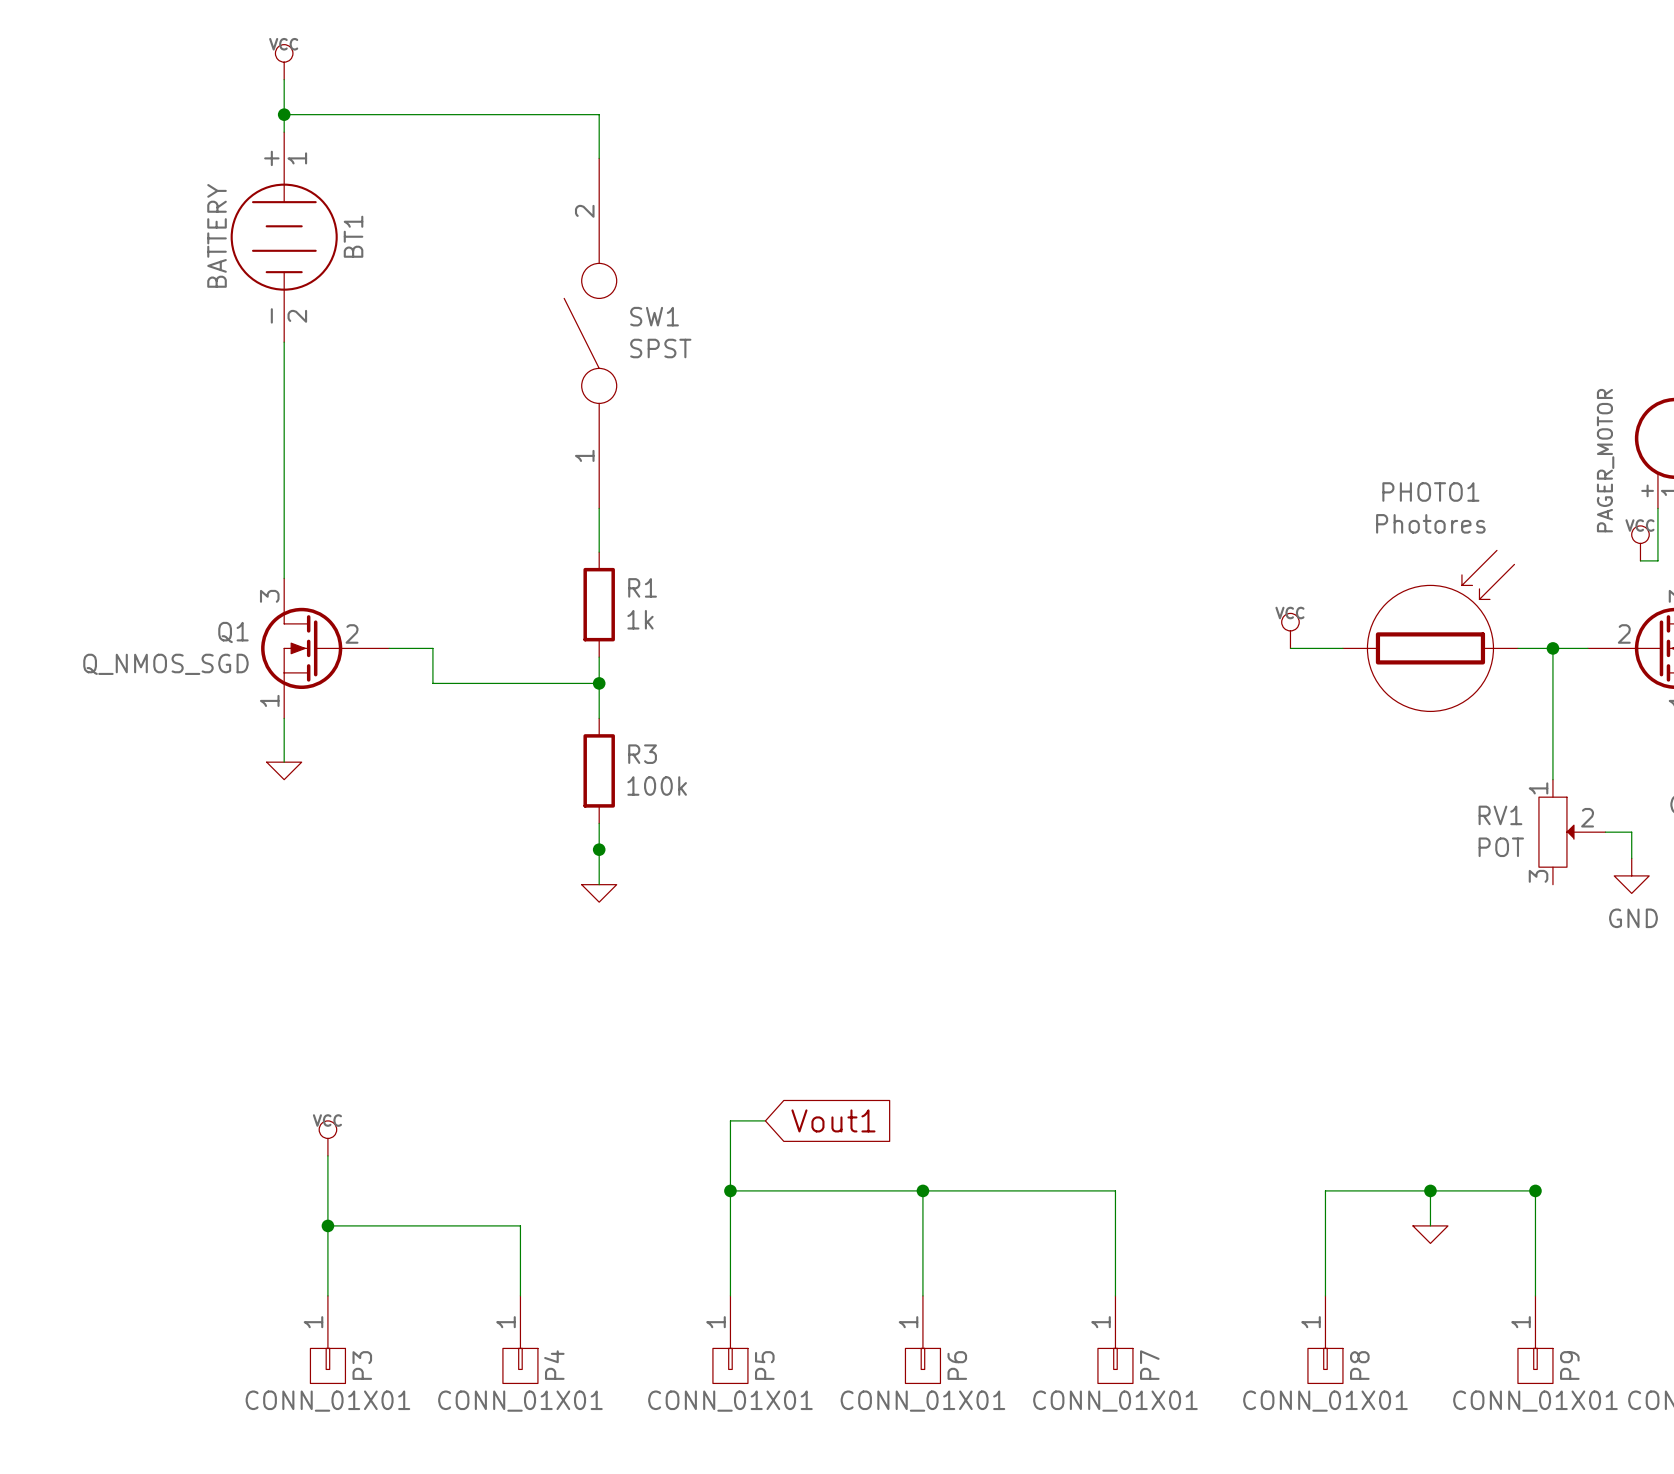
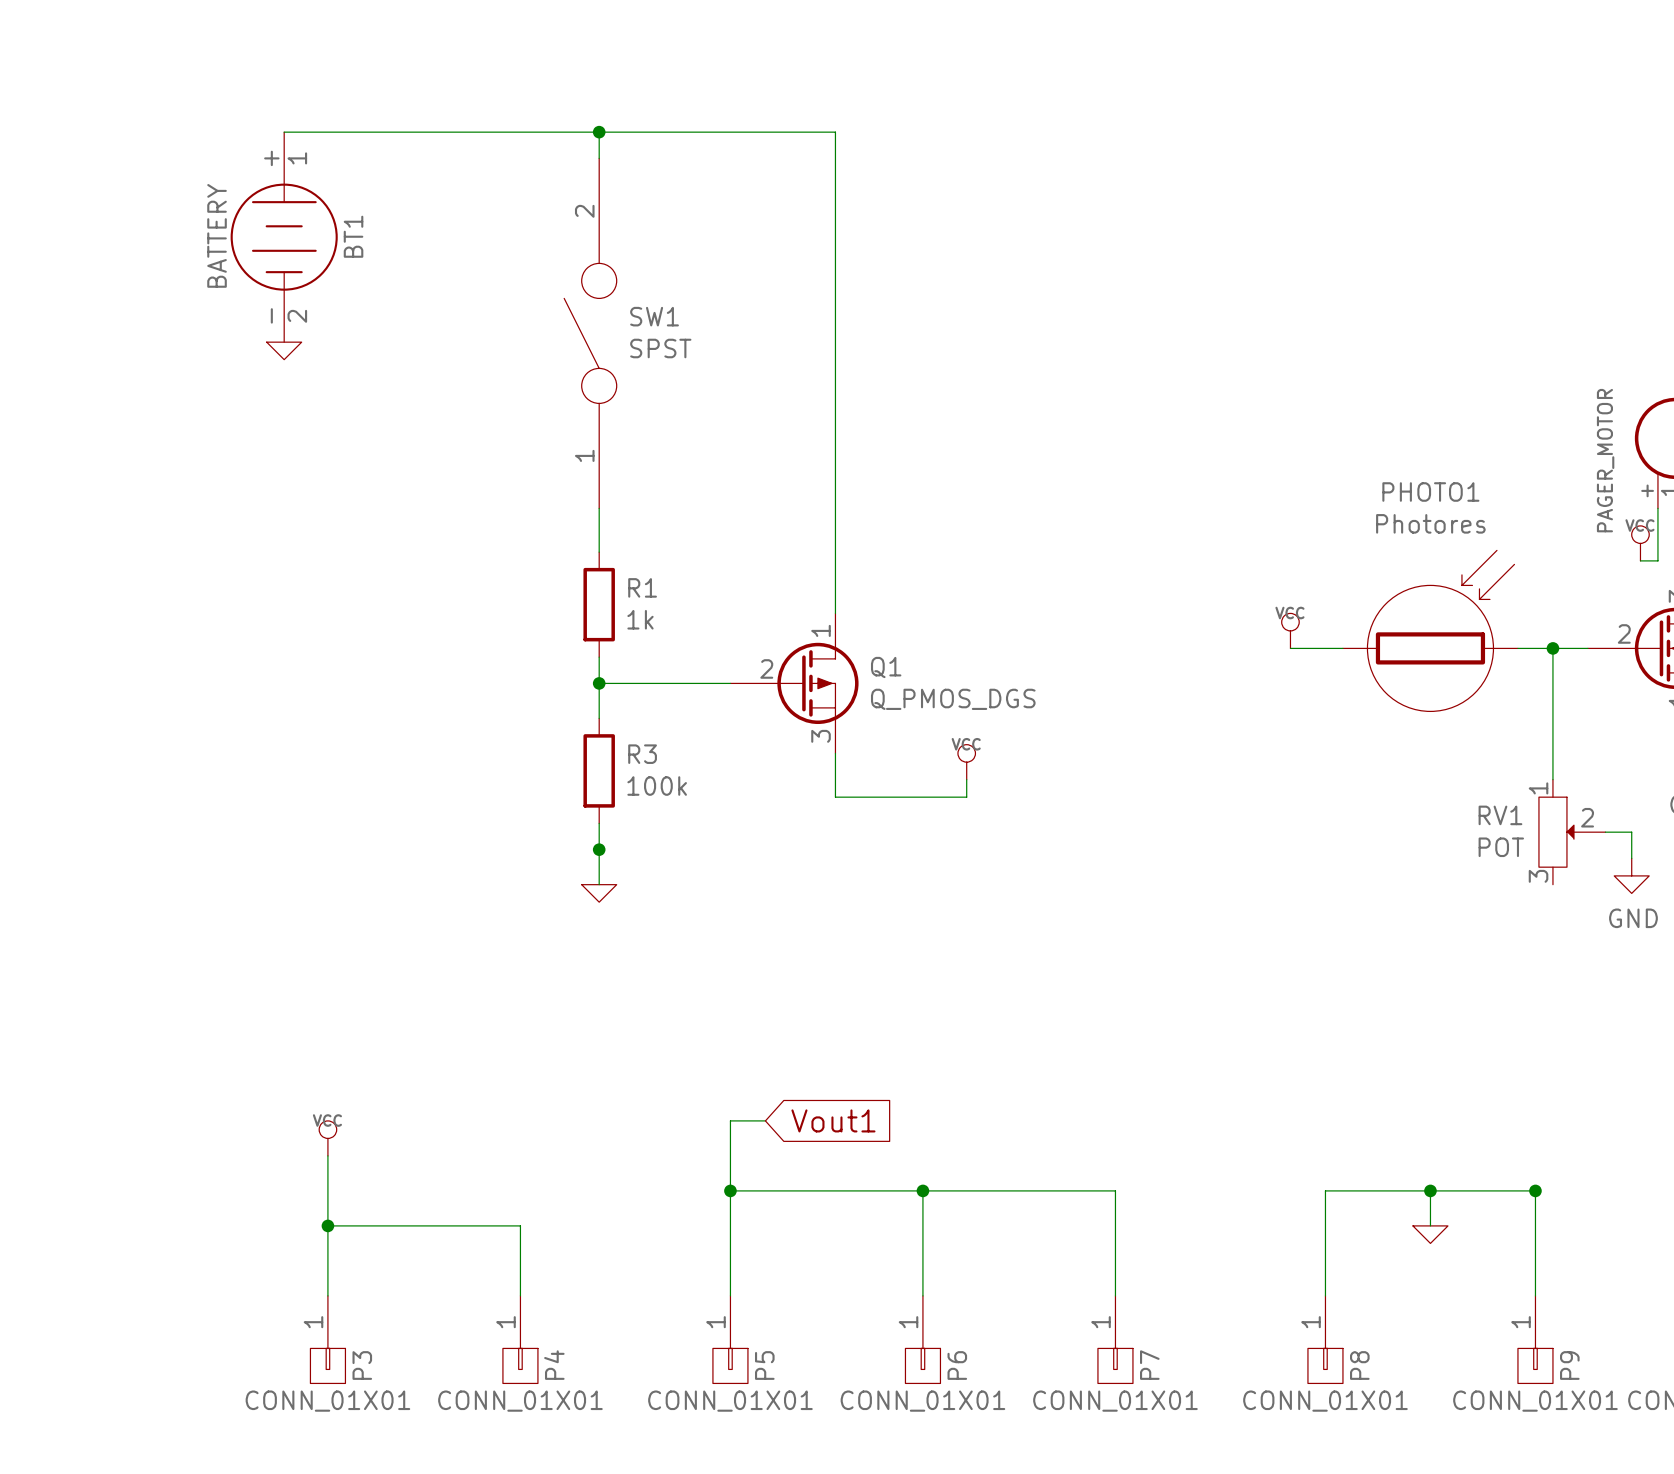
power symbol: VCC (284, 62) -> none
wire: (284, 79) (284, 132) -> (835, 613) (835, 132) (284, 132)
wire: (284, 114) (599, 114) (599, 132) -> none
junction: (284, 114) -> none
junction: none -> (599, 132)
wire: (284, 342) (284, 578) -> none
power symbol: none -> (284, 350)
Q1 symbol: [261, 578, 390, 719] -> [730, 613, 859, 754]
Q1 name position: Q1 (233, 632) -> Q1 (886, 667)
wire: (389, 648) (432, 648) (432, 683) (599, 683) -> (730, 683) (599, 683)
Q1 value: Q_NMOS_SGD (165, 664) -> Q_PMOS_DGS (953, 699)
wire: (284, 718) (284, 762) -> none
wire: none -> (835, 753) (835, 797) (966, 797) (966, 779)
power symbol: none -> VCC (966, 762)
power symbol: (284, 770) -> none

